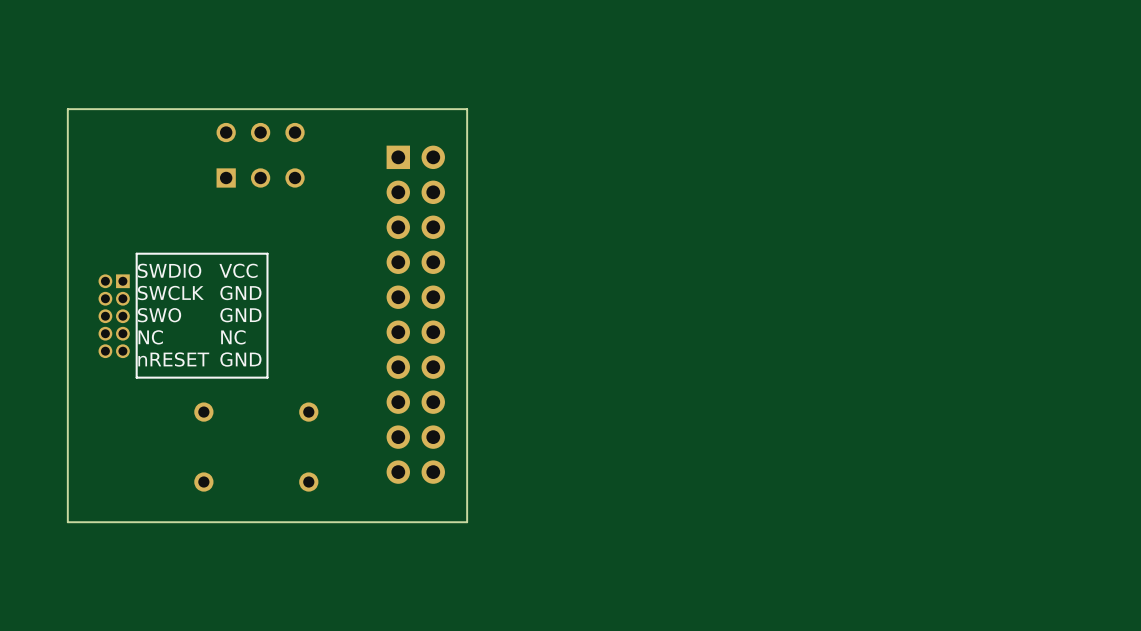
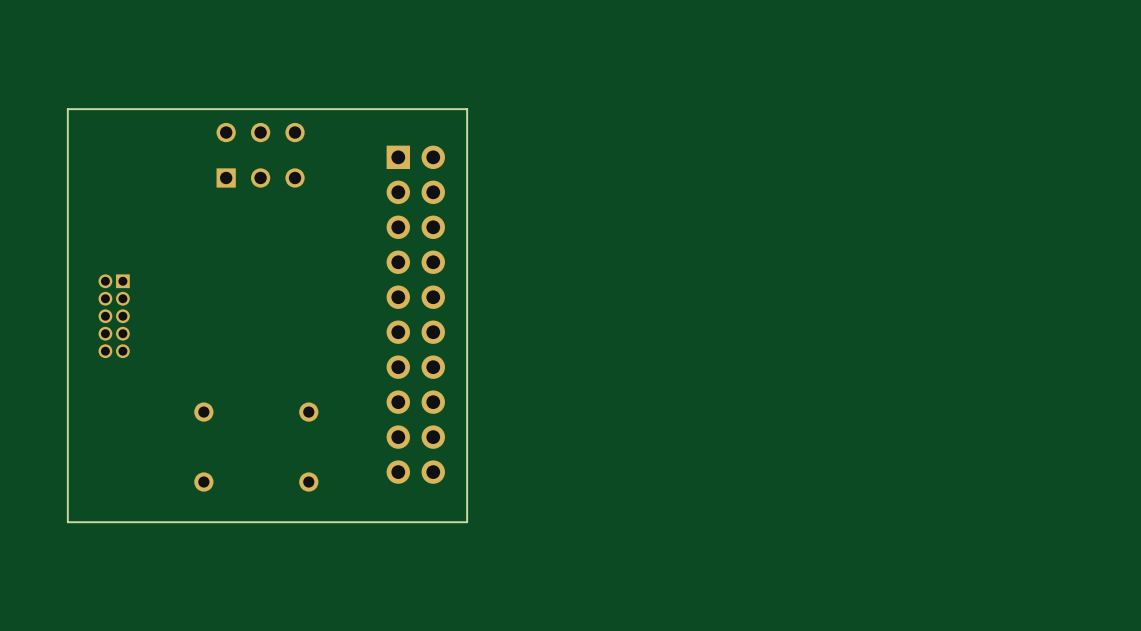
line: (267, 253) (267, 377) (136, 377) (136, 253) (267, 253) -> none
text: SWDIO (169, 270) -> none
text: VCC (238, 270) -> none
text: SWCLK (170, 293) -> none
text: GND (240, 293) -> none
text: SWO (159, 315) -> none
text: GND (240, 315) -> none
text: NC (150, 337) -> none
text: NC (233, 337) -> none
text: nRESET (173, 359) -> none
text: GND (240, 359) -> none

